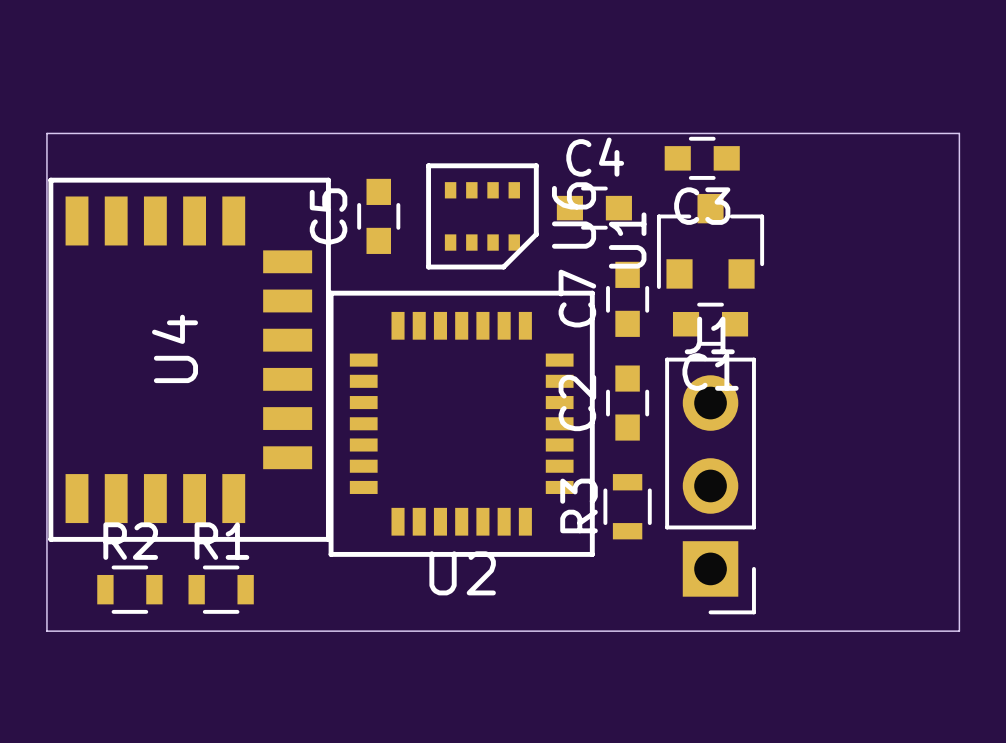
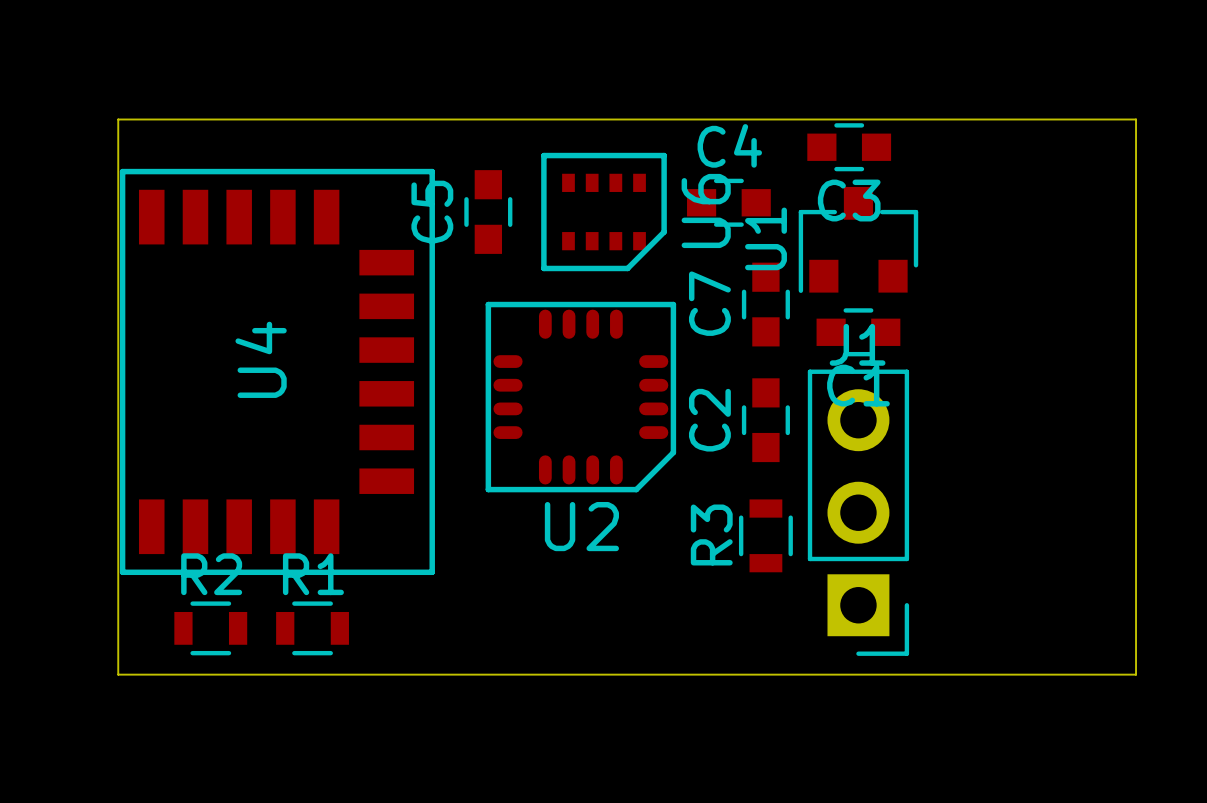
U2 footprint: [328, 290, 595, 557] -> [485, 301, 677, 493]

